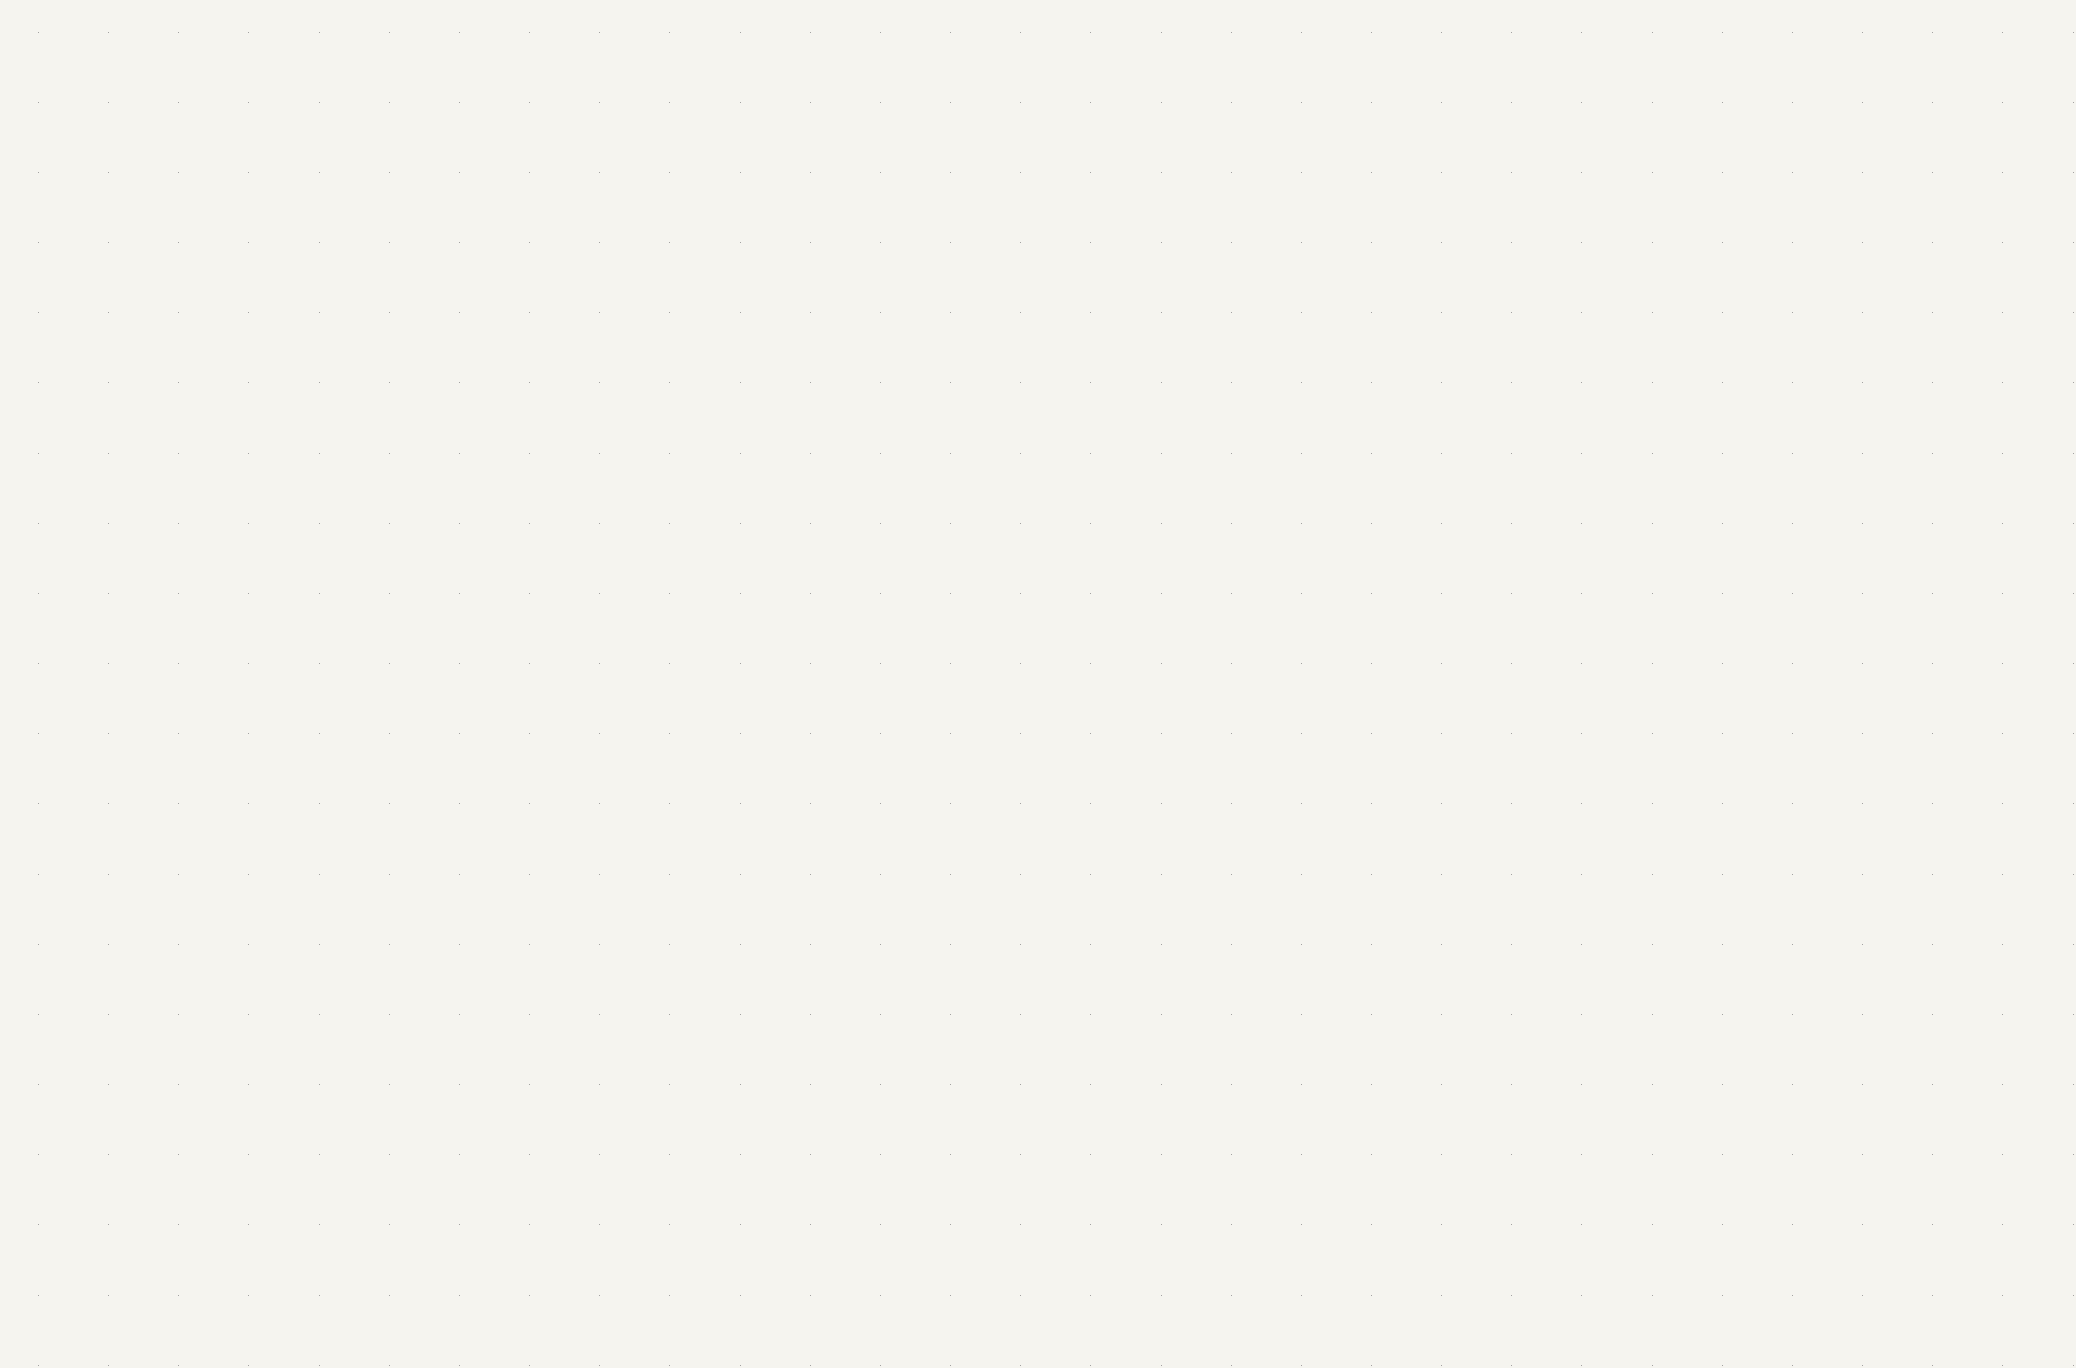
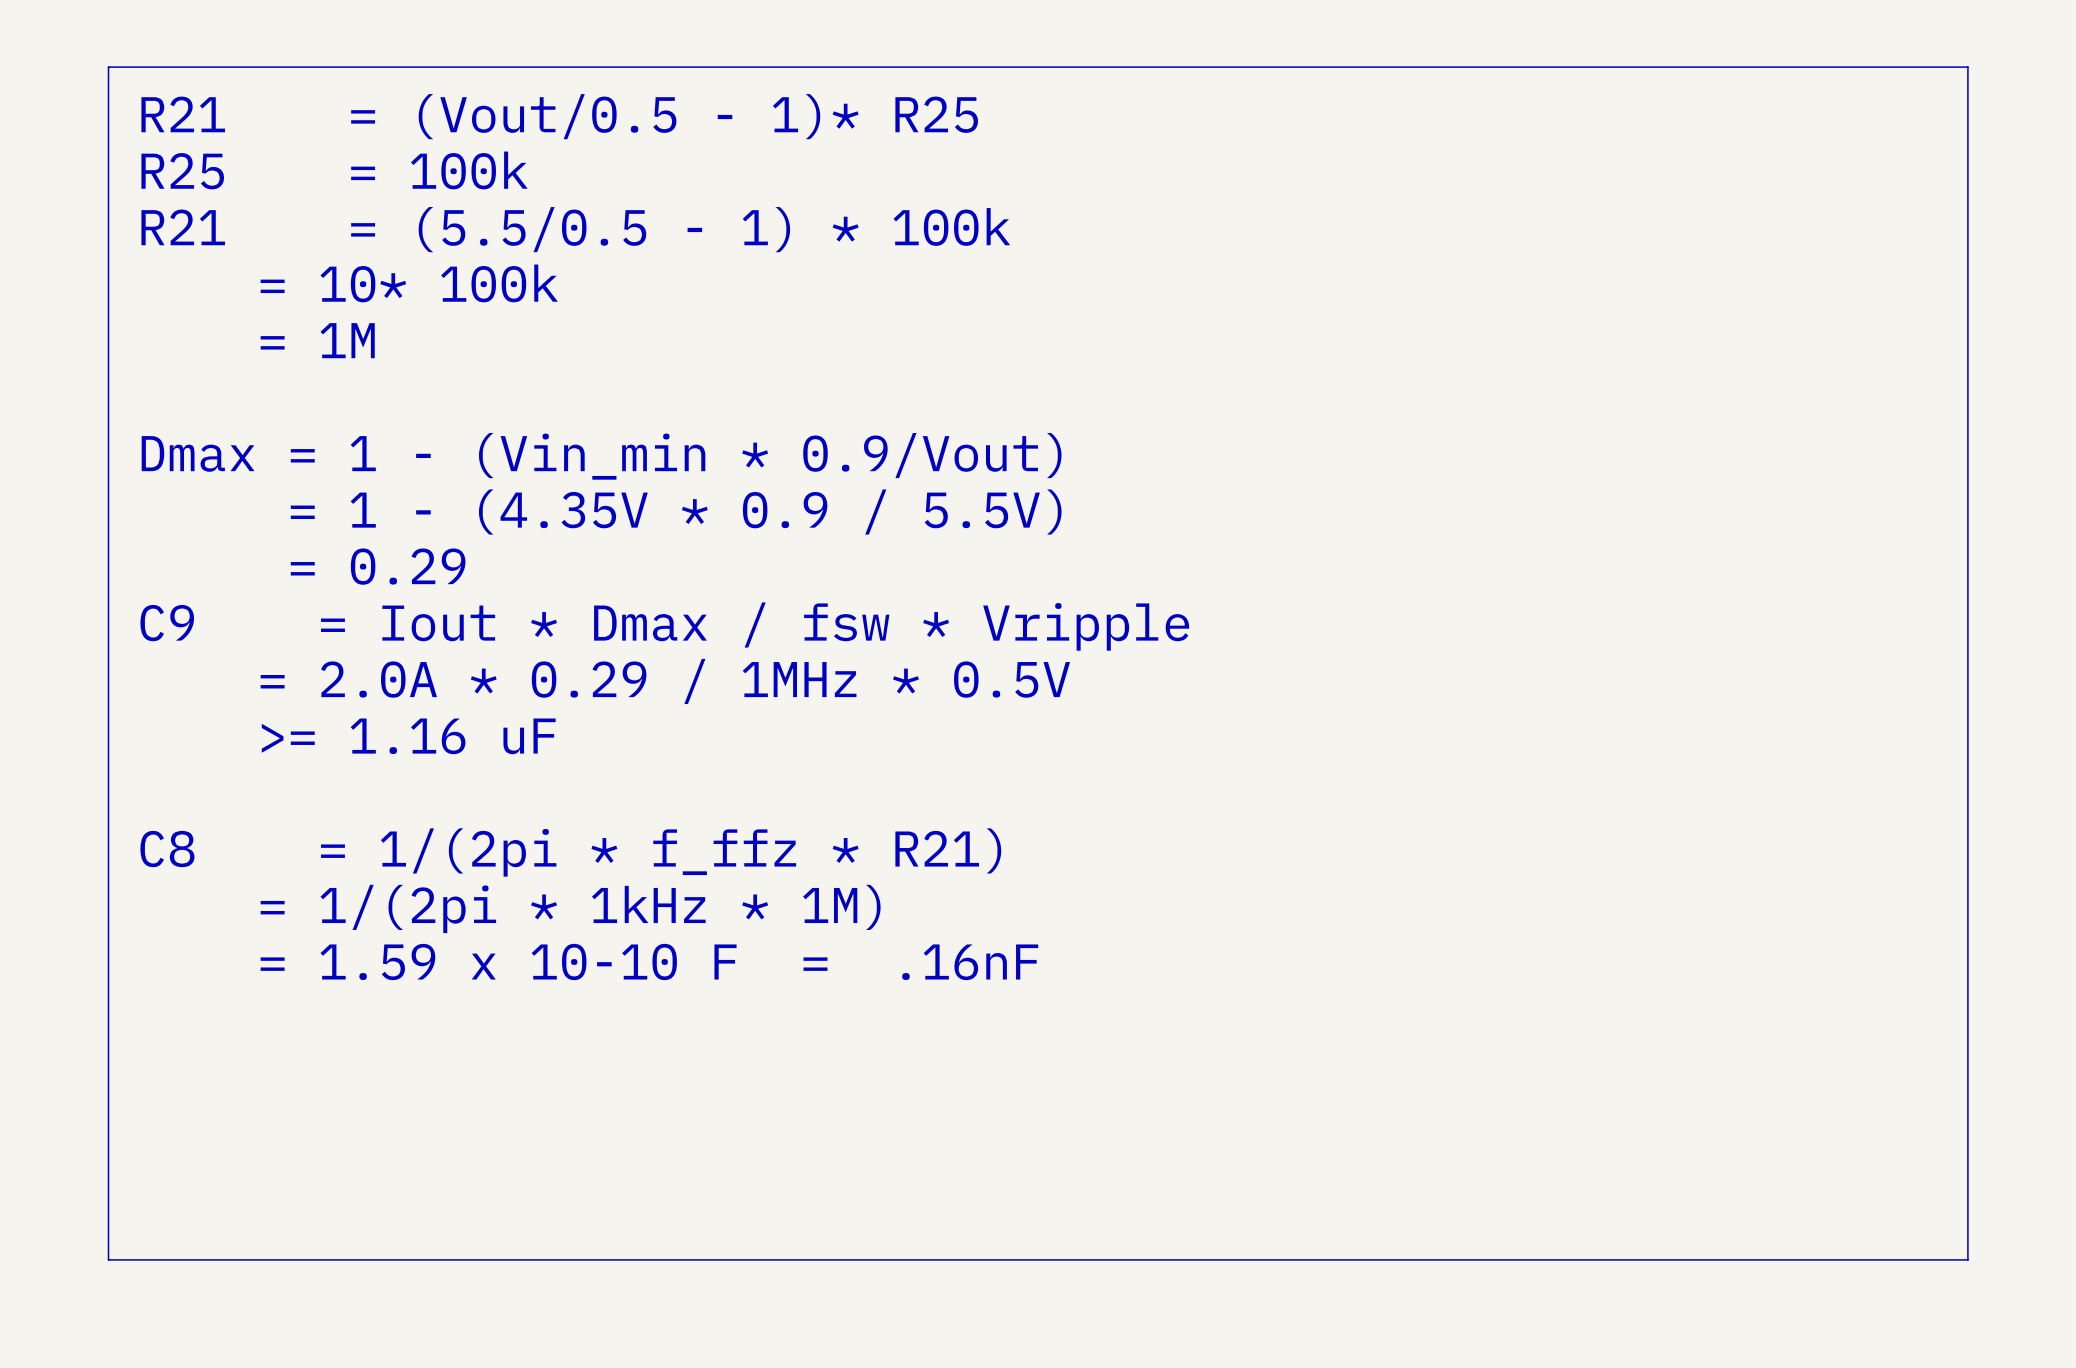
line: none -> (108, 67) (1967, 67) (1967, 1259) (108, 1259) (108, 67)
text: none -> R21 = (Vout/0.5 - 1)* R25 (559, 116)
text: none -> R25 = 100k (334, 170)
text: none -> R21 = (5.5/0.5 - 1) * 100k (575, 229)
text: none -> = 10* 100k (409, 283)
text: none -> = 1M (317, 340)
text: none -> Dmax = 1 - (Vin_min * 0.9/Vout) (601, 456)
text: none -> = 1 - (4.35V * 0.9 / 5.5V) (676, 512)
text: none -> = 0.29 (378, 566)
text: none -> C9 = Iout * Dmax / fsw * Vripple (664, 626)
text: none -> = 2.0A * 0.29 / 1MHz * 0.5V (665, 681)
text: none -> >= 1.16 uF (408, 736)
text: none -> C8 = 1/(2pi * f_ffz * R21) (570, 852)
text: none -> = 1/(2pi * 1kHz * 1M) (570, 908)
text: none -> = 1.59 x 10-10 F = .16nF (649, 961)

